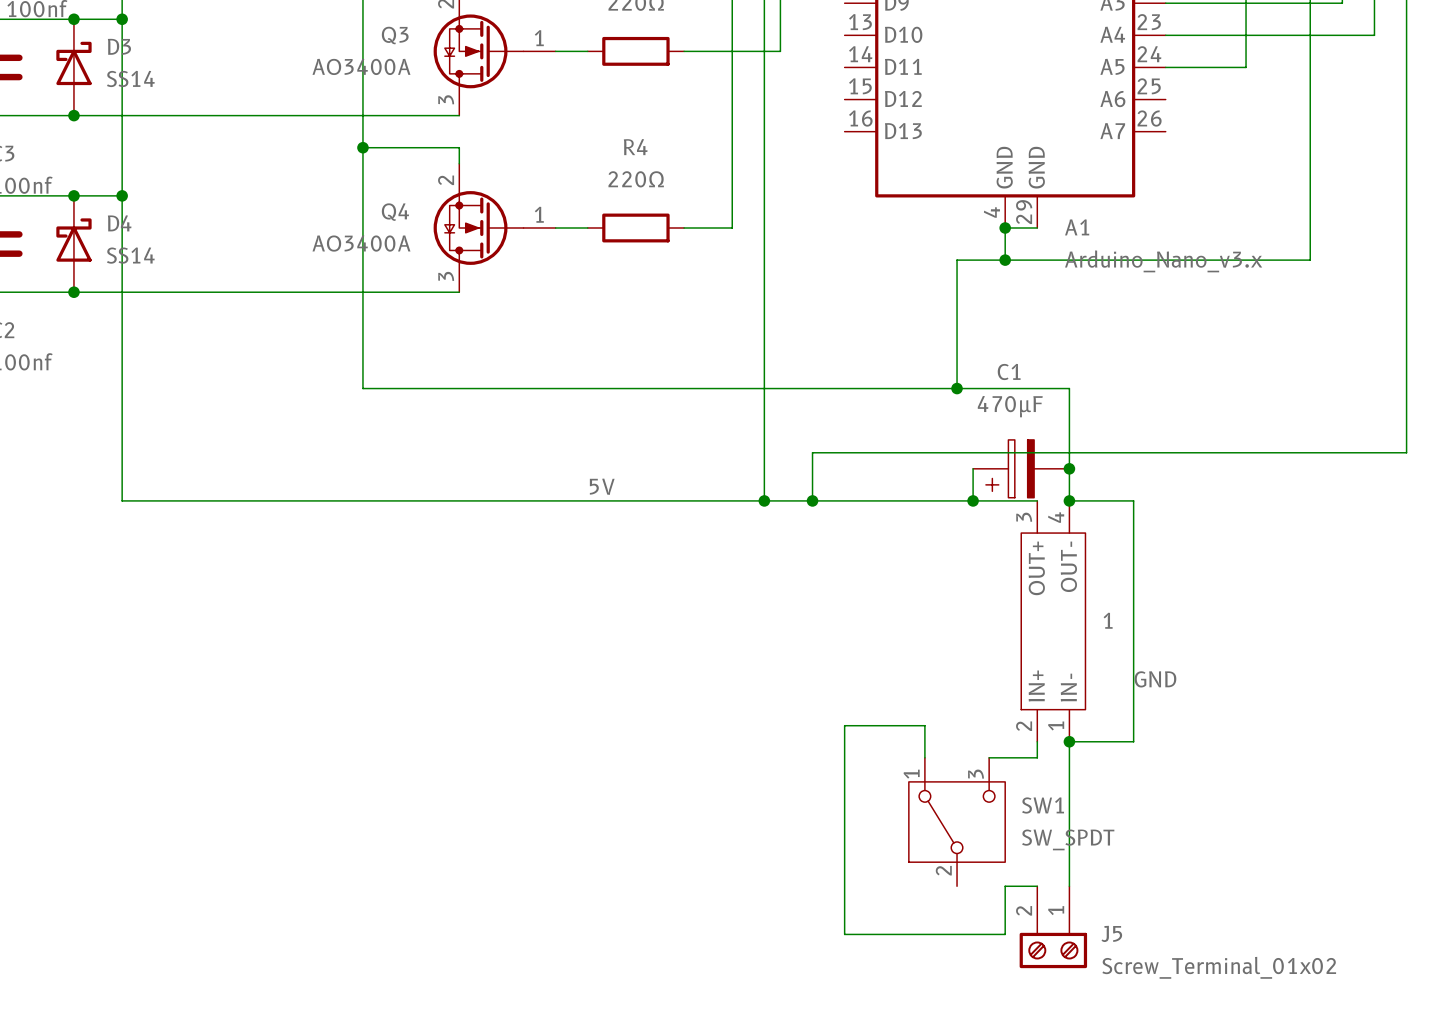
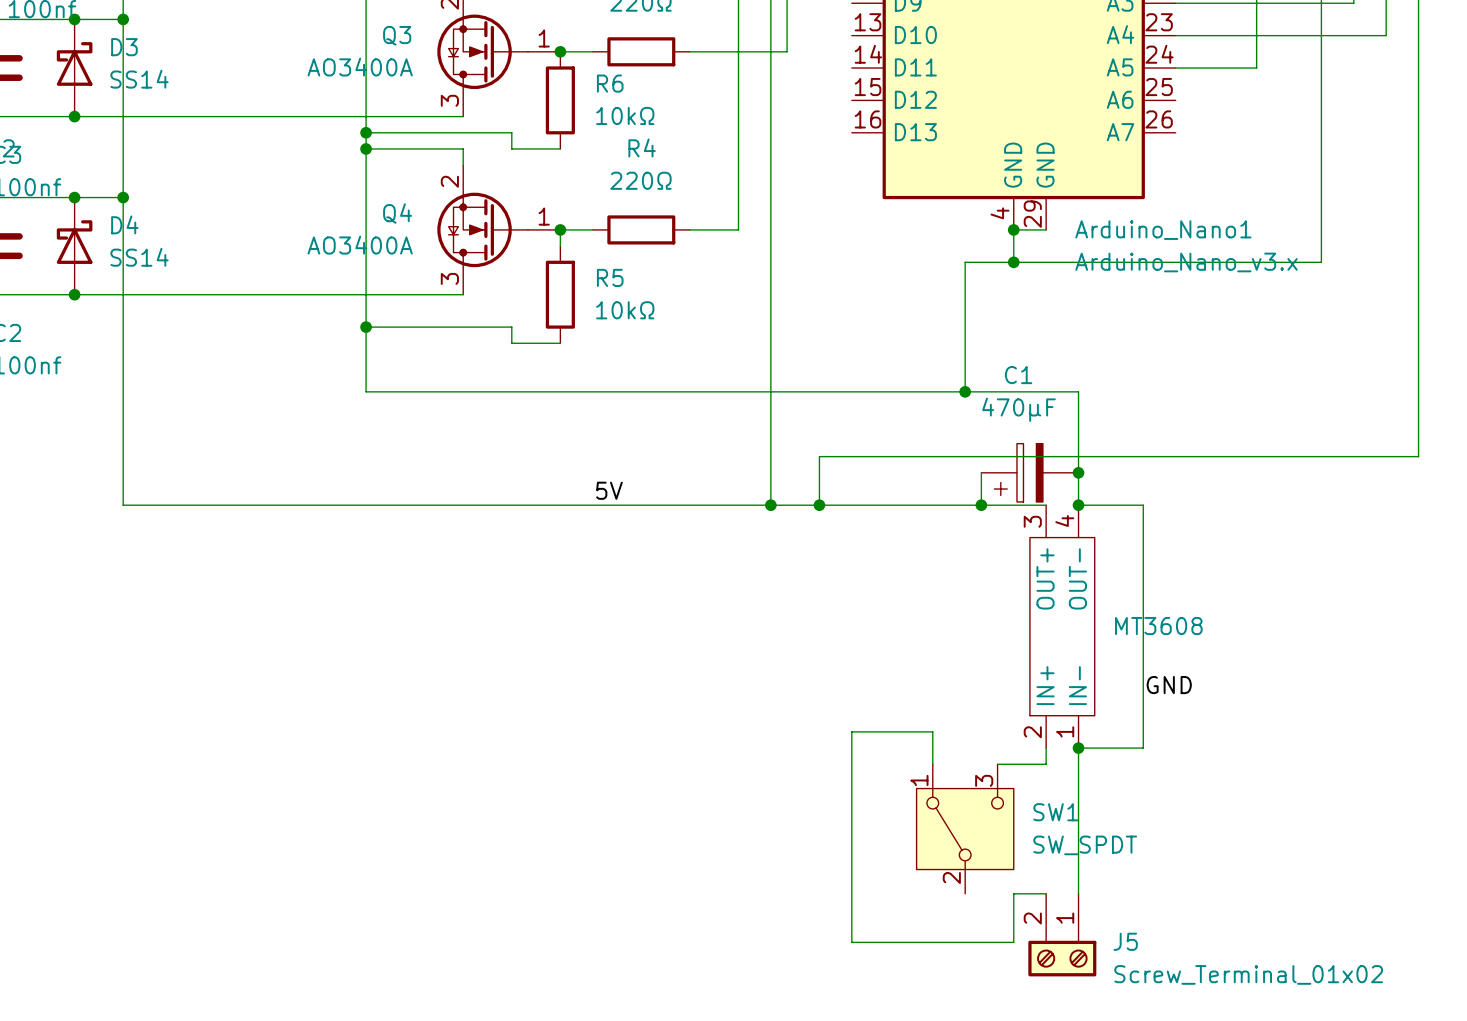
junction: none -> (560, 51)
R6: none -> 10kΩ (560, 100)
wire: none -> (366, 132) (511, 132) (511, 148) (560, 148)
junction: none -> (366, 132)
wire: none -> (560, 229) (560, 246)
junction: none -> (560, 229)
A1 name: A1 (1077, 227) -> Arduino_Nano1 (1163, 230)
R5: none -> 10kΩ (560, 294)
wire: none -> (366, 327) (511, 327) (511, 343) (560, 343)
junction: none -> (366, 327)
1 name: 1 (1108, 620) -> MT3608 (1158, 626)

